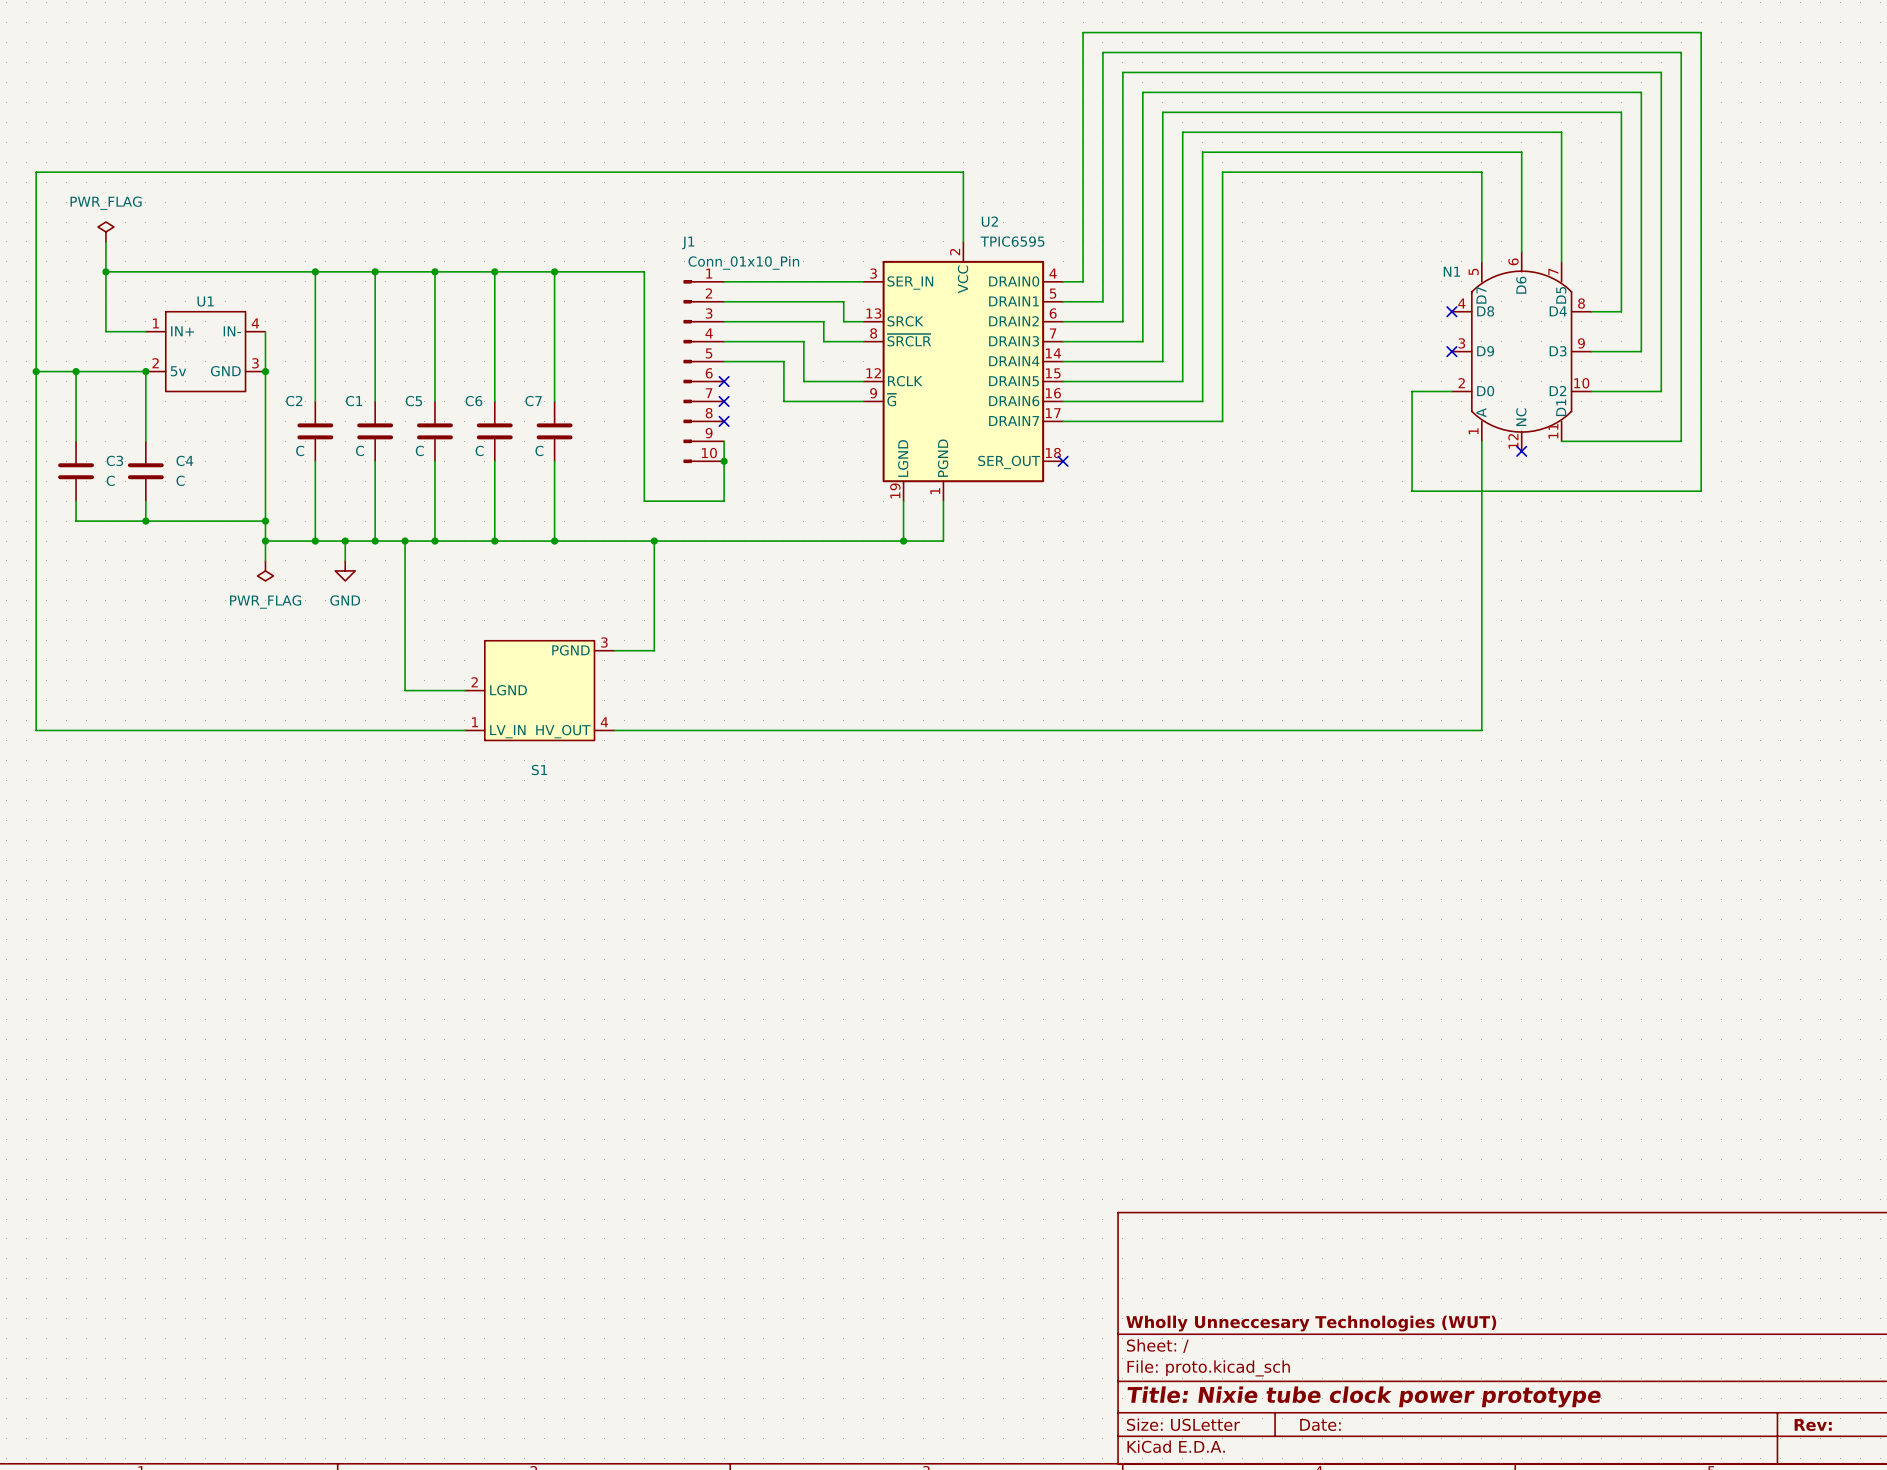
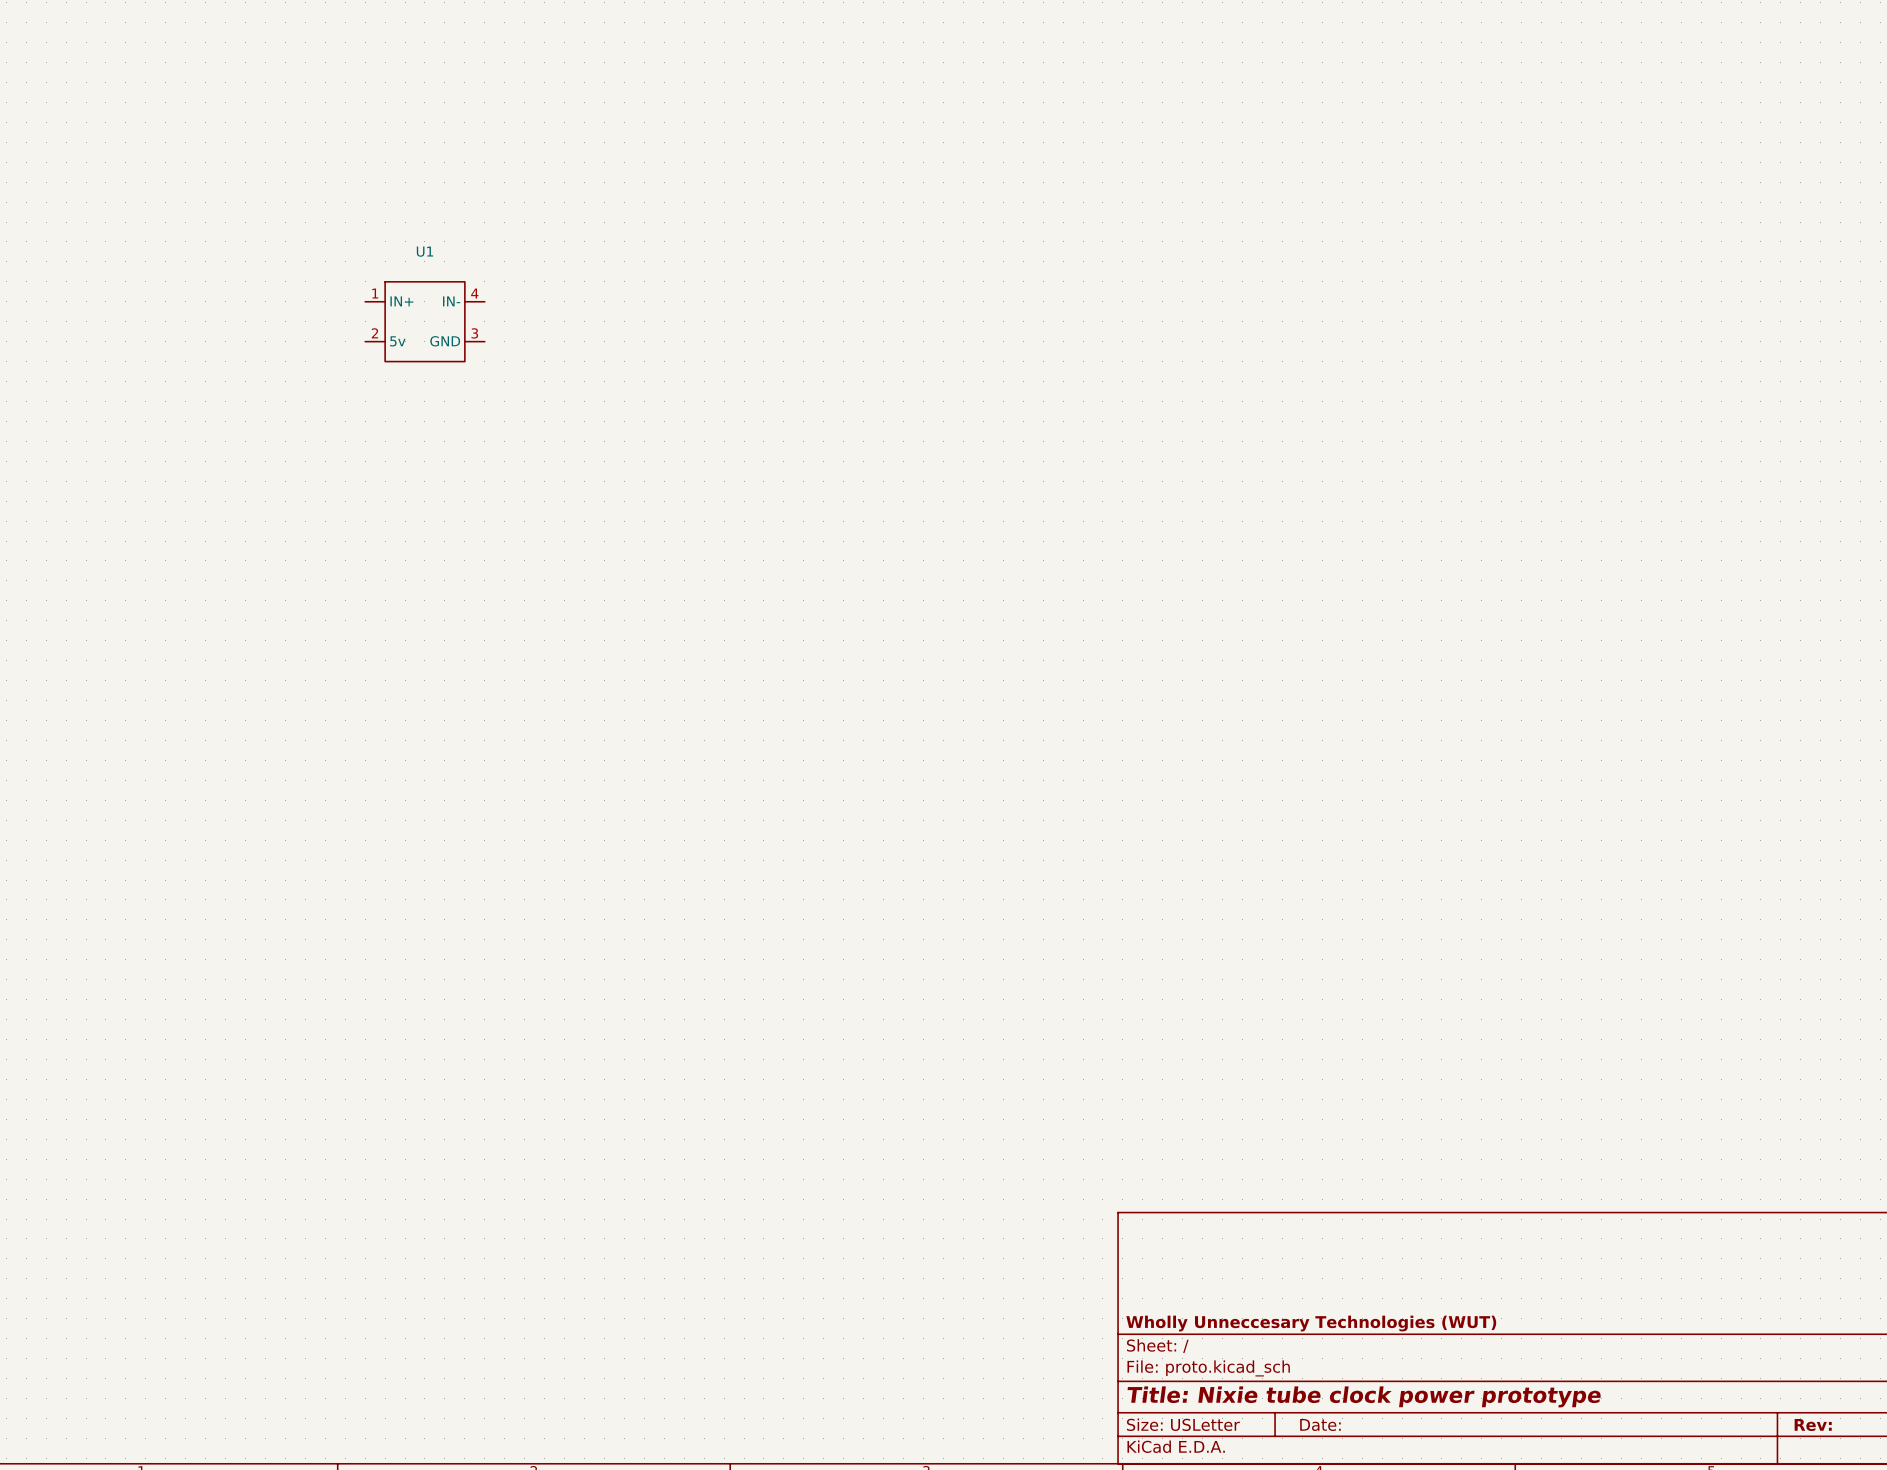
power symbol: PWR_FLAG (105, 231) -> none
wire: (105, 241) (105, 331) (145, 331) -> none
wire: (963, 241) (963, 172) (36, 172) (36, 730) (464, 730) -> none
wire: (1521, 251) (1521, 152) (1202, 152) (1202, 401) (1063, 401) -> none
wire: (1481, 261) (1481, 172) (1222, 172) (1222, 421) (1063, 421) -> none
wire: (1561, 261) (1561, 132) (1182, 132) (1182, 381) (1063, 381) -> none
wire: (105, 271) (644, 271) (644, 501) (724, 501) (724, 441) -> none
junction: (105, 271) -> none
wire: (315, 271) (315, 401) -> none
junction: (315, 271) -> none
wire: (375, 271) (375, 401) -> none
junction: (375, 271) -> none
wire: (434, 271) (434, 401) -> none
junction: (434, 271) -> none
wire: (494, 271) (494, 401) -> none
junction: (494, 271) -> none
wire: (554, 271) (554, 401) -> none
junction: (554, 271) -> none
wire: (724, 281) (863, 281) -> none
wire: (1063, 281) (1083, 281) (1083, 32) (1701, 32) (1701, 491) (1412, 491) (1412, 391) (1451, 391) -> none
U1 name position: U1 (205, 301) -> U1 (424, 251)
wire: (724, 301) (843, 301) (843, 321) (863, 321) -> none
wire: (1063, 301) (1102, 301) (1102, 52) (1681, 52) (1681, 441) (1561, 441) -> none
no-connect mark: (1451, 311) -> none
wire: (1591, 311) (1621, 311) (1621, 112) (1162, 112) (1162, 361) (1063, 361) -> none
wire: (724, 321) (823, 321) (823, 341) (863, 341) -> none
wire: (1063, 321) (1122, 321) (1122, 72) (1661, 72) (1661, 391) (1591, 391) -> none
wire: (265, 331) (265, 560) -> none
wire: (724, 341) (803, 341) (803, 381) (863, 381) -> none
wire: (1063, 341) (1142, 341) (1142, 92) (1641, 92) (1641, 351) (1591, 351) -> none
U1 position: (205, 351) -> (424, 321)
no-connect mark: (1451, 351) -> none
N1: (1521, 351) -> none
wire: (724, 361) (783, 361) (783, 401) (863, 401) -> none
wire: (36, 371) (145, 371) (145, 441) -> none
junction: (36, 371) -> none
wire: (76, 371) (76, 441) -> none
junction: (76, 371) -> none
junction: (145, 371) -> none
junction: (265, 371) -> none
J1: Conn_01x10_Pin (703, 371) -> none
U2: TPIC6595 (963, 371) -> none
no-connect mark: (724, 381) -> none
no-connect mark: (724, 401) -> none
no-connect mark: (724, 421) -> none
C2: C (315, 431) -> none
C1: C (375, 431) -> none
C5: C (434, 431) -> none
C6: C (494, 431) -> none
C7: C (554, 431) -> none
wire: (1481, 441) (1481, 730) (614, 730) -> none
no-connect mark: (1521, 451) -> none
wire: (315, 461) (315, 541) -> none
wire: (375, 461) (375, 541) -> none
wire: (434, 461) (434, 541) -> none
wire: (494, 461) (494, 541) -> none
wire: (554, 461) (554, 541) -> none
junction: (724, 461) -> none
no-connect mark: (1063, 461) -> none
C3: C (76, 471) -> none
C4: C (145, 471) -> none
wire: (76, 501) (76, 521) (265, 521) -> none
wire: (145, 501) (145, 521) -> none
wire: (903, 501) (903, 541) -> none
wire: (943, 501) (943, 541) (265, 541) -> none
junction: (145, 521) -> none
junction: (265, 521) -> none
junction: (265, 541) -> none
junction: (315, 541) -> none
wire: (345, 541) (345, 560) -> none
junction: (345, 541) -> none
junction: (375, 541) -> none
wire: (405, 541) (405, 690) (464, 690) -> none
junction: (405, 541) -> none
junction: (434, 541) -> none
junction: (494, 541) -> none
junction: (554, 541) -> none
wire: (654, 541) (654, 650) (614, 650) -> none
junction: (654, 541) -> none
junction: (903, 541) -> none
power symbol: PWR_FLAG (265, 570) -> none
power symbol: GND (345, 570) -> none
S1: (539, 690) -> none

